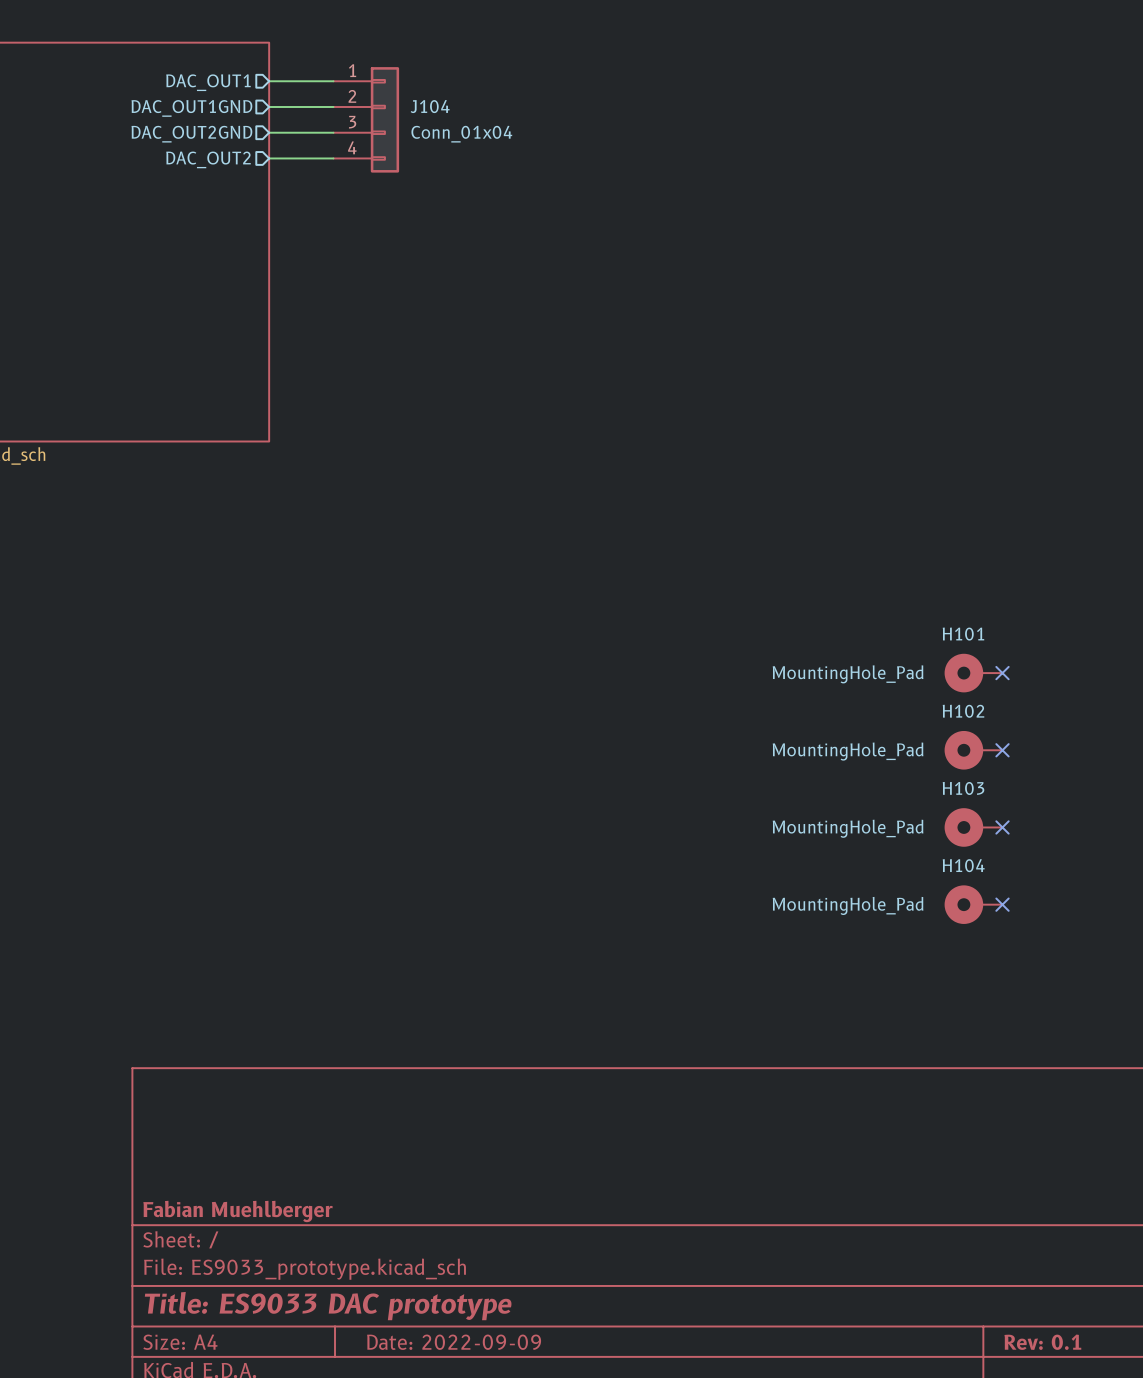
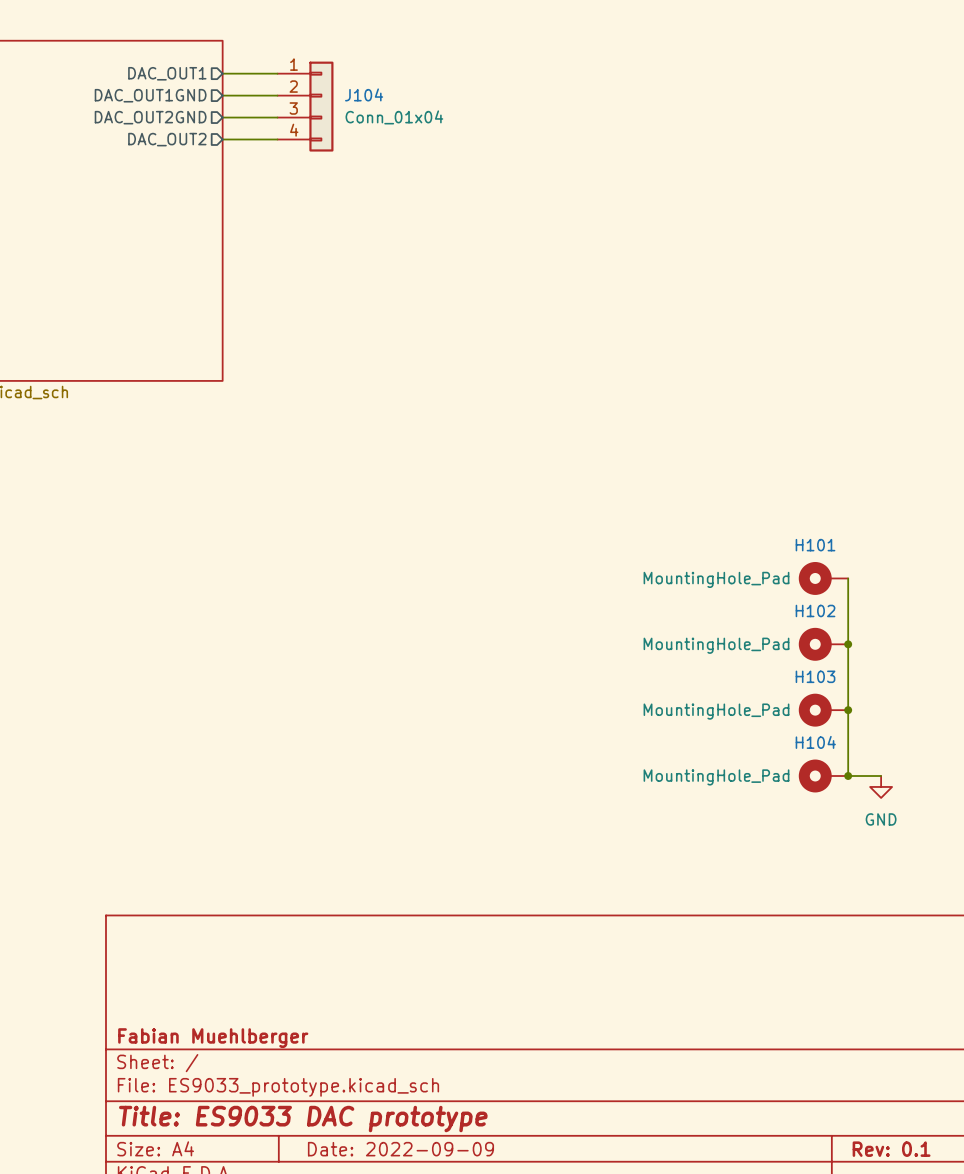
wire: none -> (848, 578) (848, 776) (881, 776)
no-connect mark: (1002, 673) -> none
no-connect mark: (1002, 750) -> none
junction: none -> (848, 644)
no-connect mark: (1002, 827) -> none
junction: none -> (848, 710)
no-connect mark: (1002, 904) -> none
junction: none -> (848, 776)
power symbol: none -> GND (881, 786)

